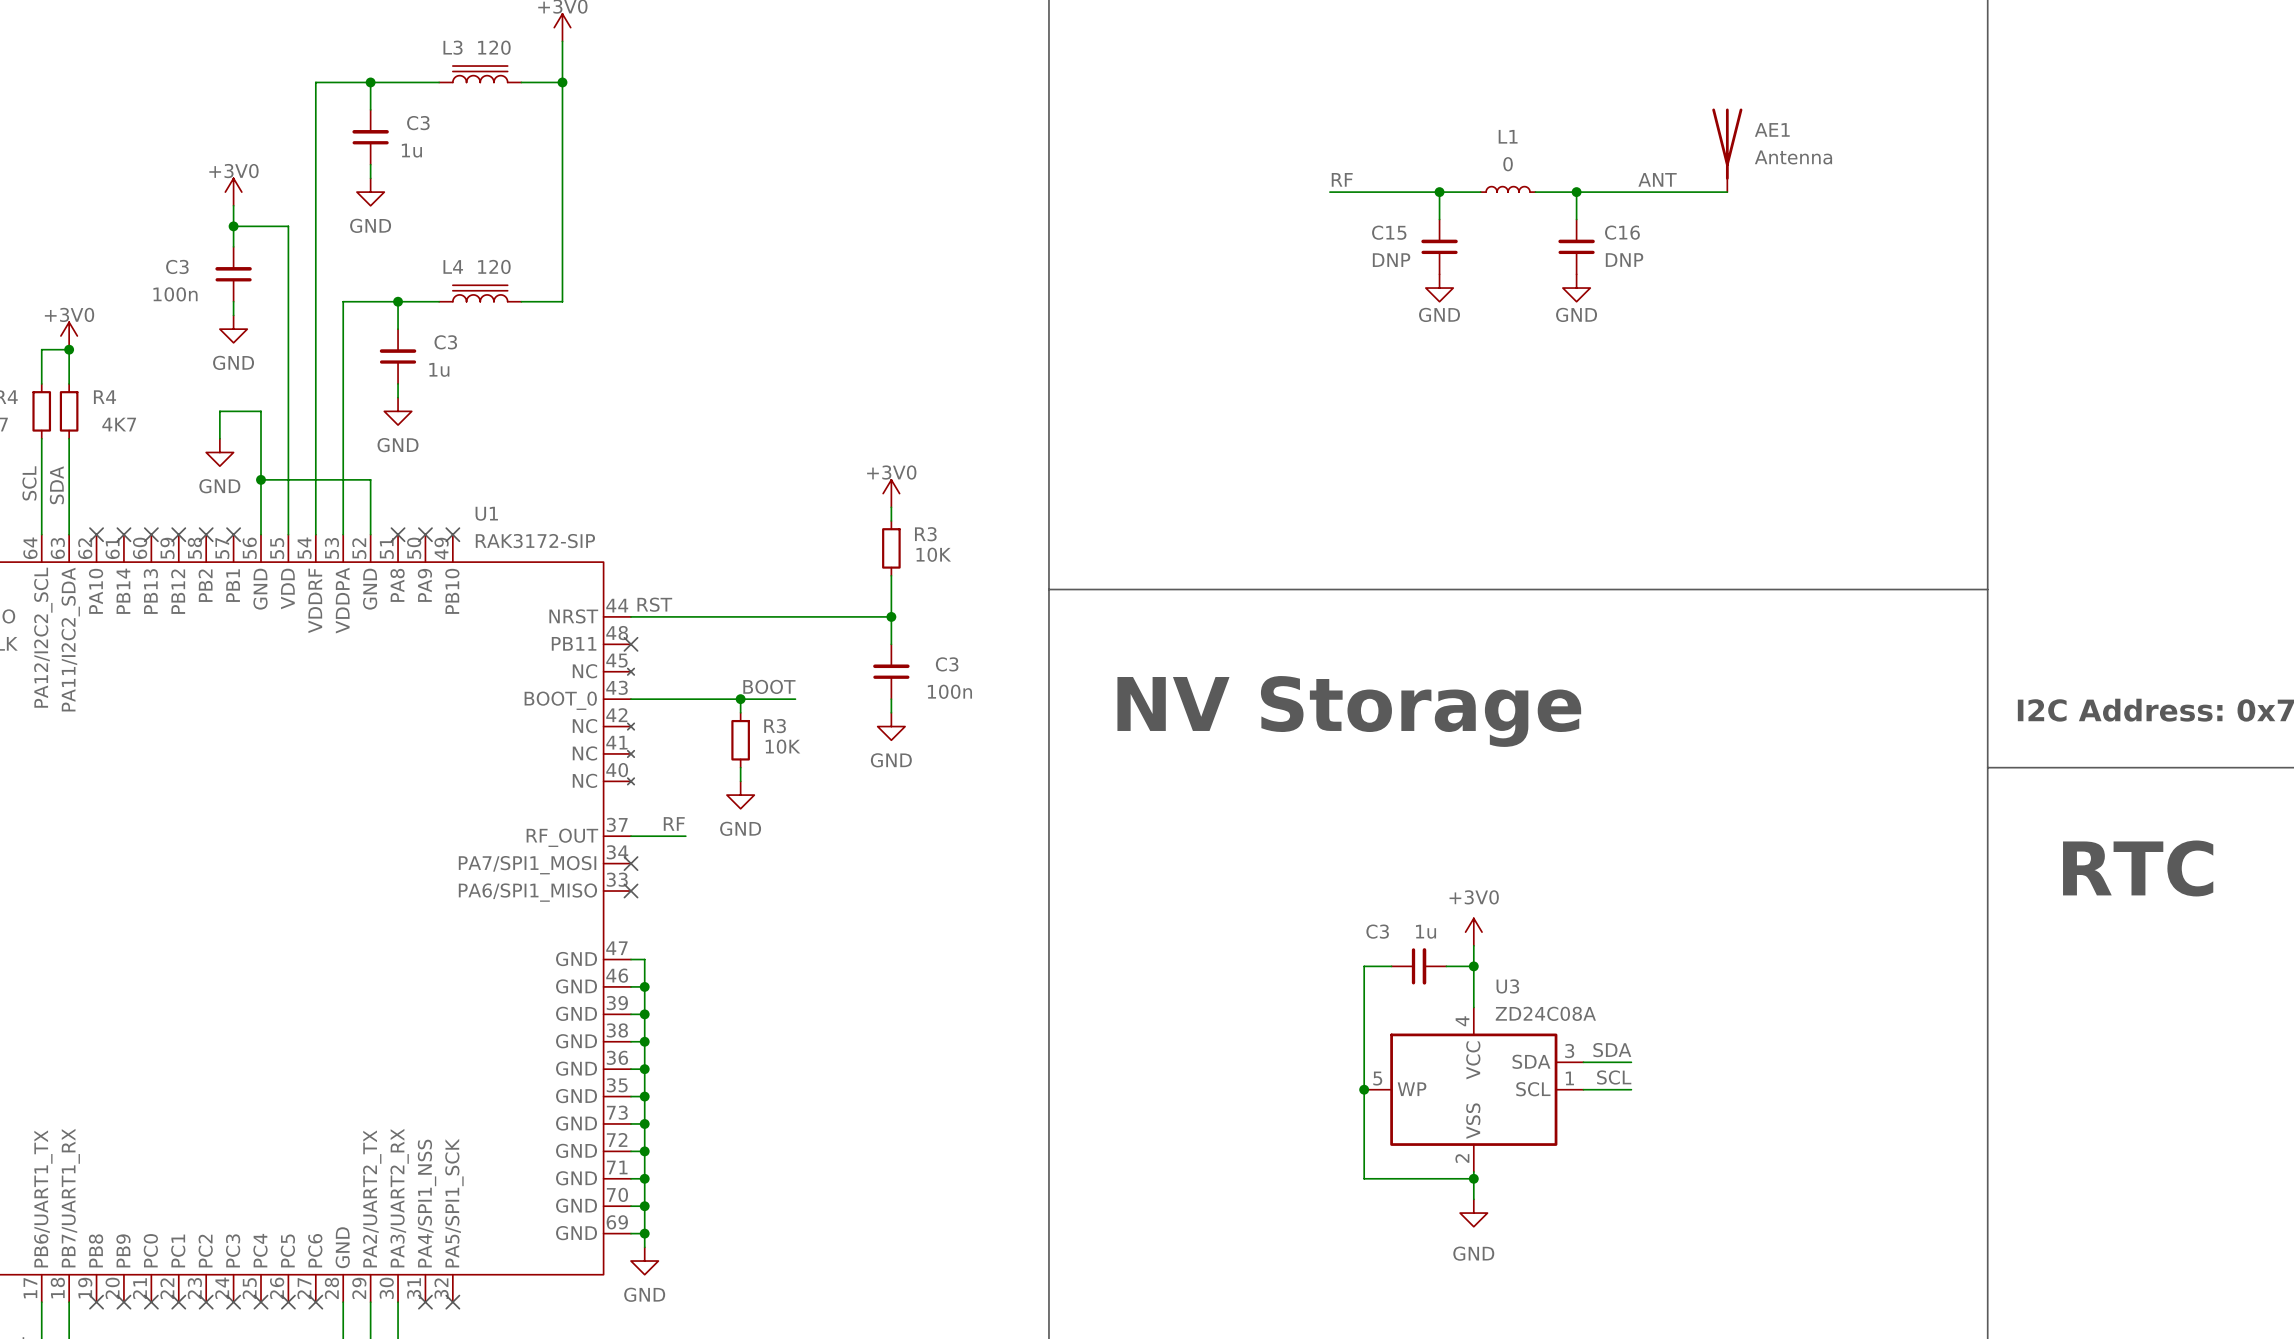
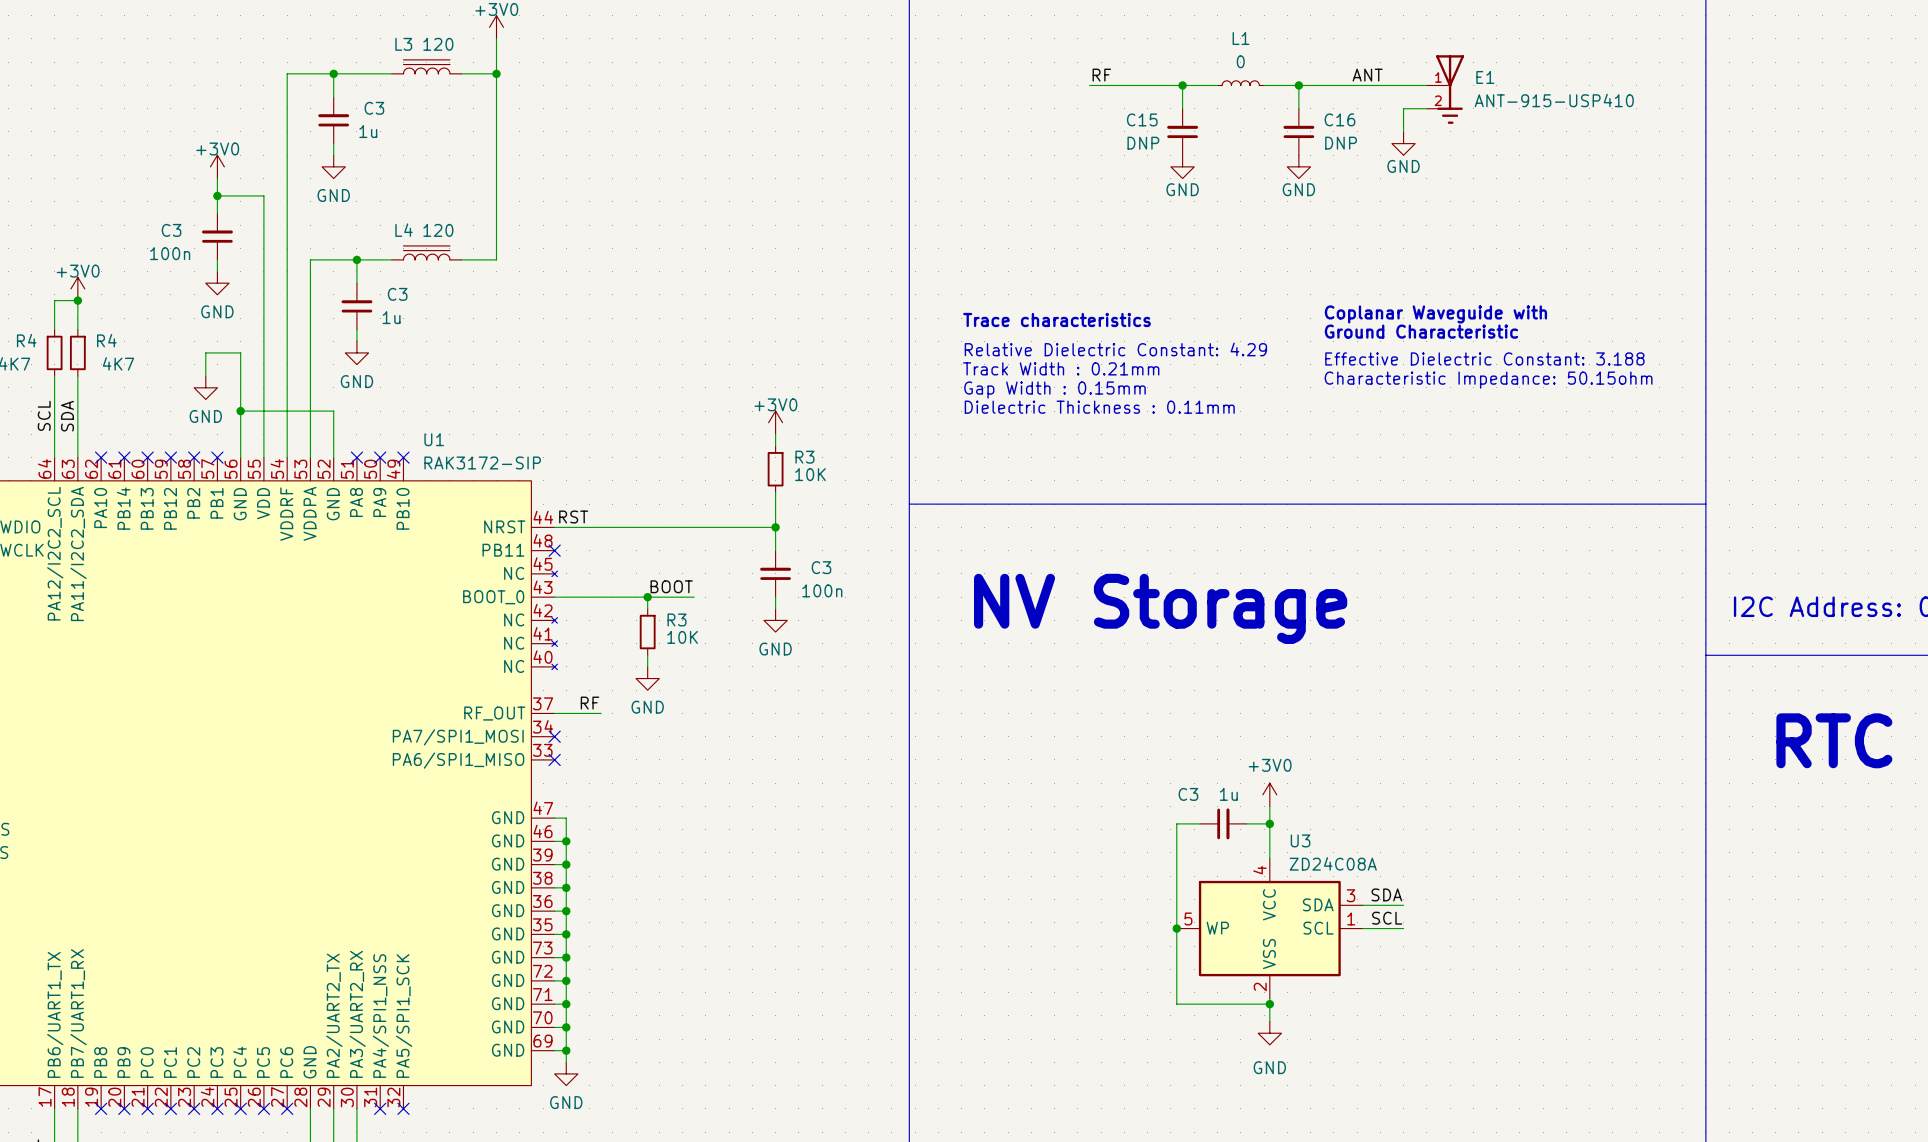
junction: none -> (1182, 85)
junction: none -> (1298, 85)
E1: none -> ANT-915-USP410 (1445, 89)
wire: none -> (1426, 108) (1403, 108) (1403, 131)
AE1: Antenna (1727, 150) -> none
power symbol: none -> GND (1403, 143)
label position: RF (1342, 179) -> RF (1101, 75)
label position: ANT (1657, 179) -> ANT (1367, 75)
L1 position: (1508, 189) -> (1240, 83)
wire: (1329, 192) (1480, 192) -> (1089, 85) (1217, 85)
power symbol: none -> GND (1182, 166)
wire: (1439, 192) (1439, 219) -> (1182, 85) (1182, 108)
junction: (1439, 192) -> none
power symbol: none -> GND (1298, 166)
wire: (1535, 192) (1727, 192) -> (1264, 85) (1426, 85)
wire: (1576, 192) (1576, 219) -> (1298, 85) (1298, 108)
junction: (1576, 192) -> none
C15 position: (1439, 246) -> (1182, 131)
C16 position: (1576, 246) -> (1298, 131)
power symbol: GND (1439, 288) -> none
power symbol: GND (1576, 288) -> none
text: none -> Coplanar Waveguide with (1435, 314)
text: none -> Trace characteristics (1056, 319)
text: none -> Ground Characteristic (1421, 331)
text: none -> Relative Dielectric Constant: 4.29 (1115, 349)
text: none -> Effective Dielectric Constant: 3.188 (1484, 358)
text: none -> Track Width : 0.21mm (1061, 368)
text: none -> Characteristic Impedance: 50.15ohm (1488, 380)
text: none -> Gap Width : 0.15mm (1054, 390)
text: none -> Dielectric Thickness : 0.11mm (1099, 407)

